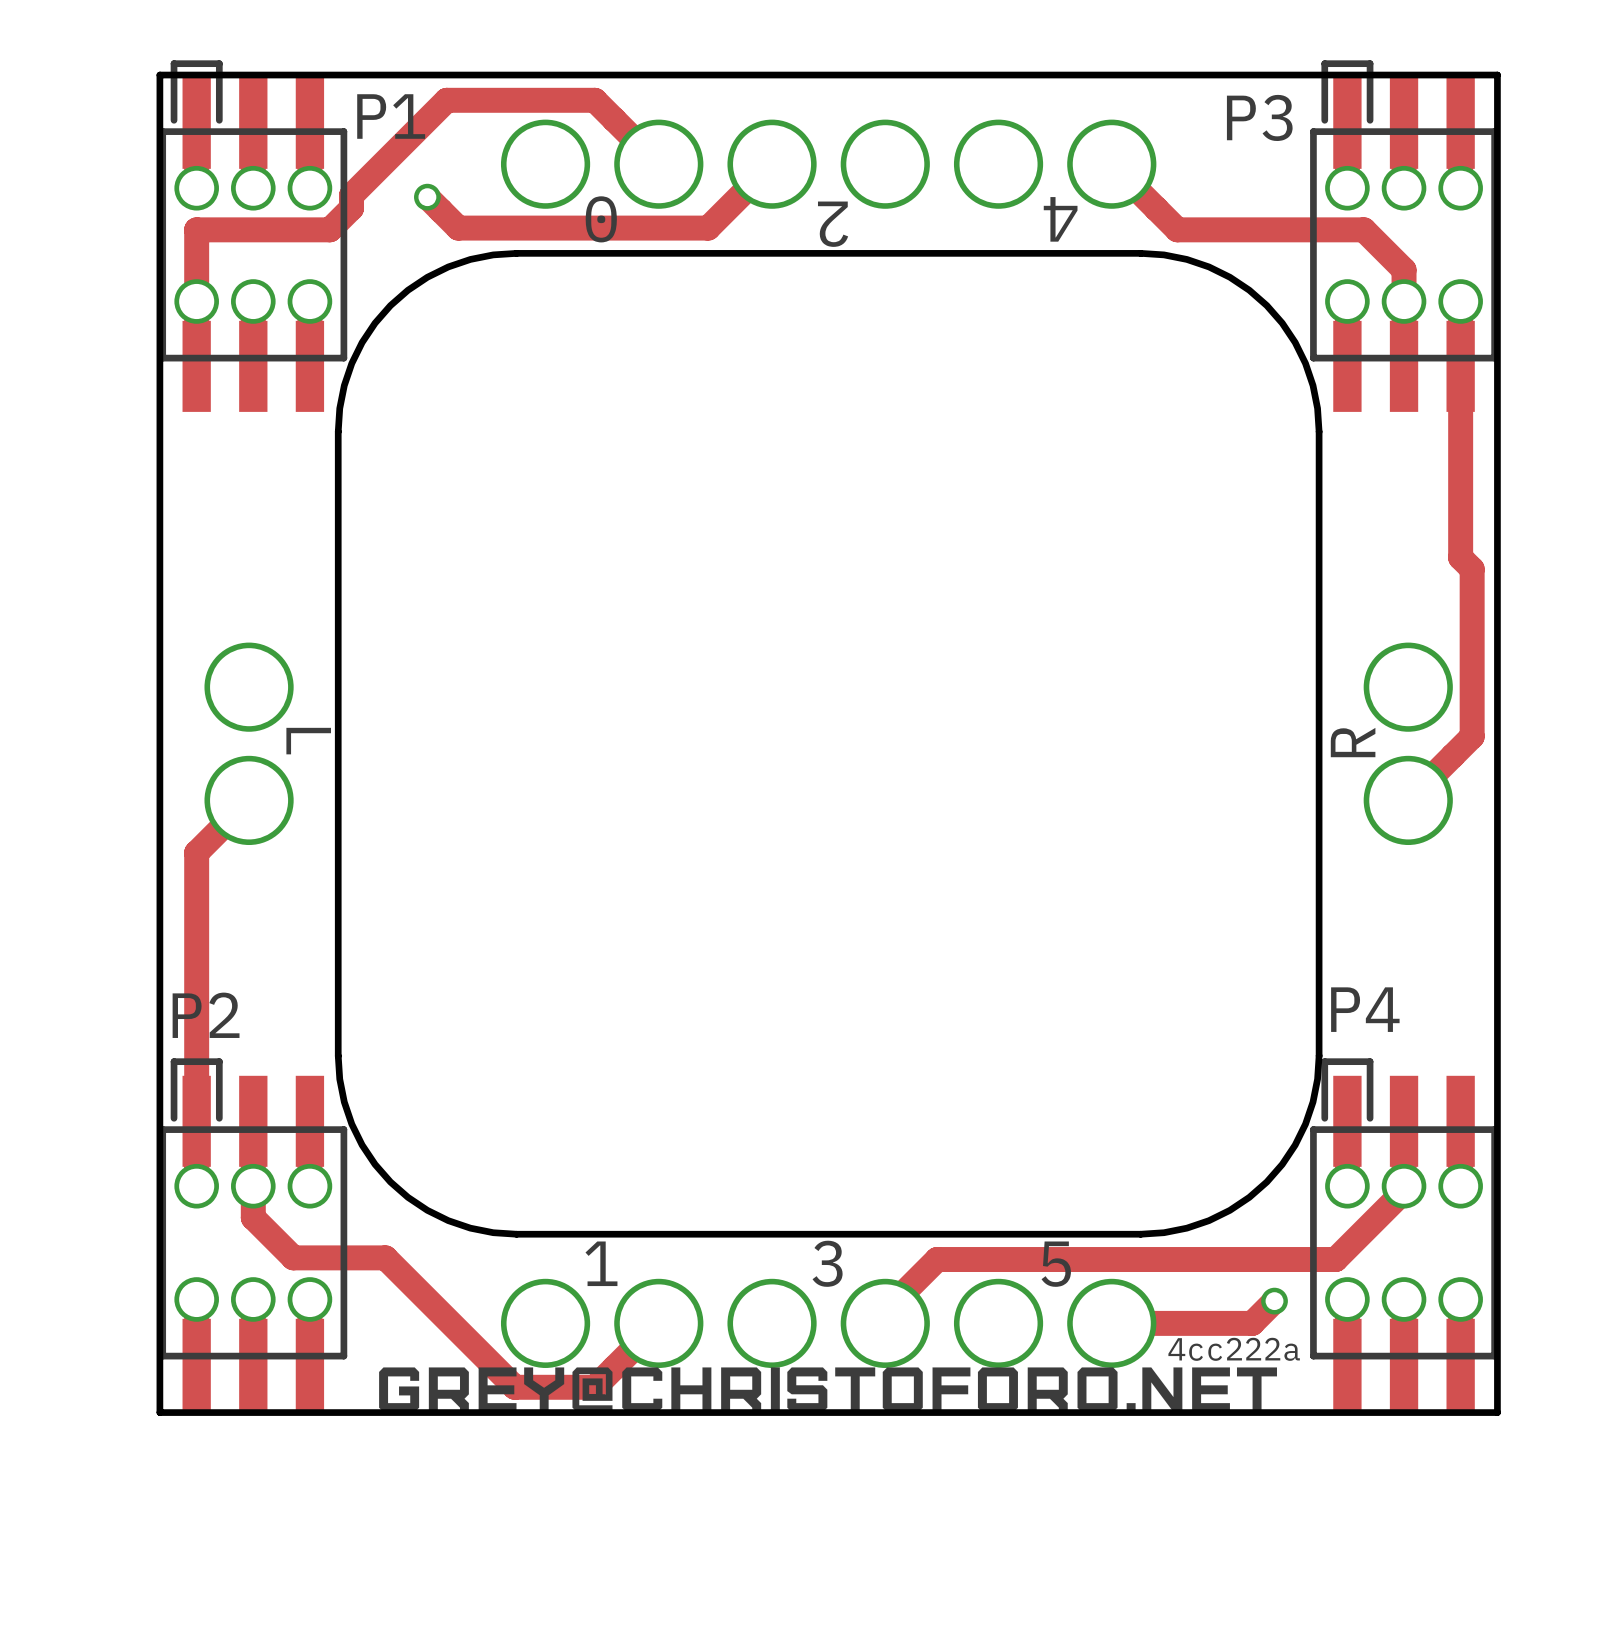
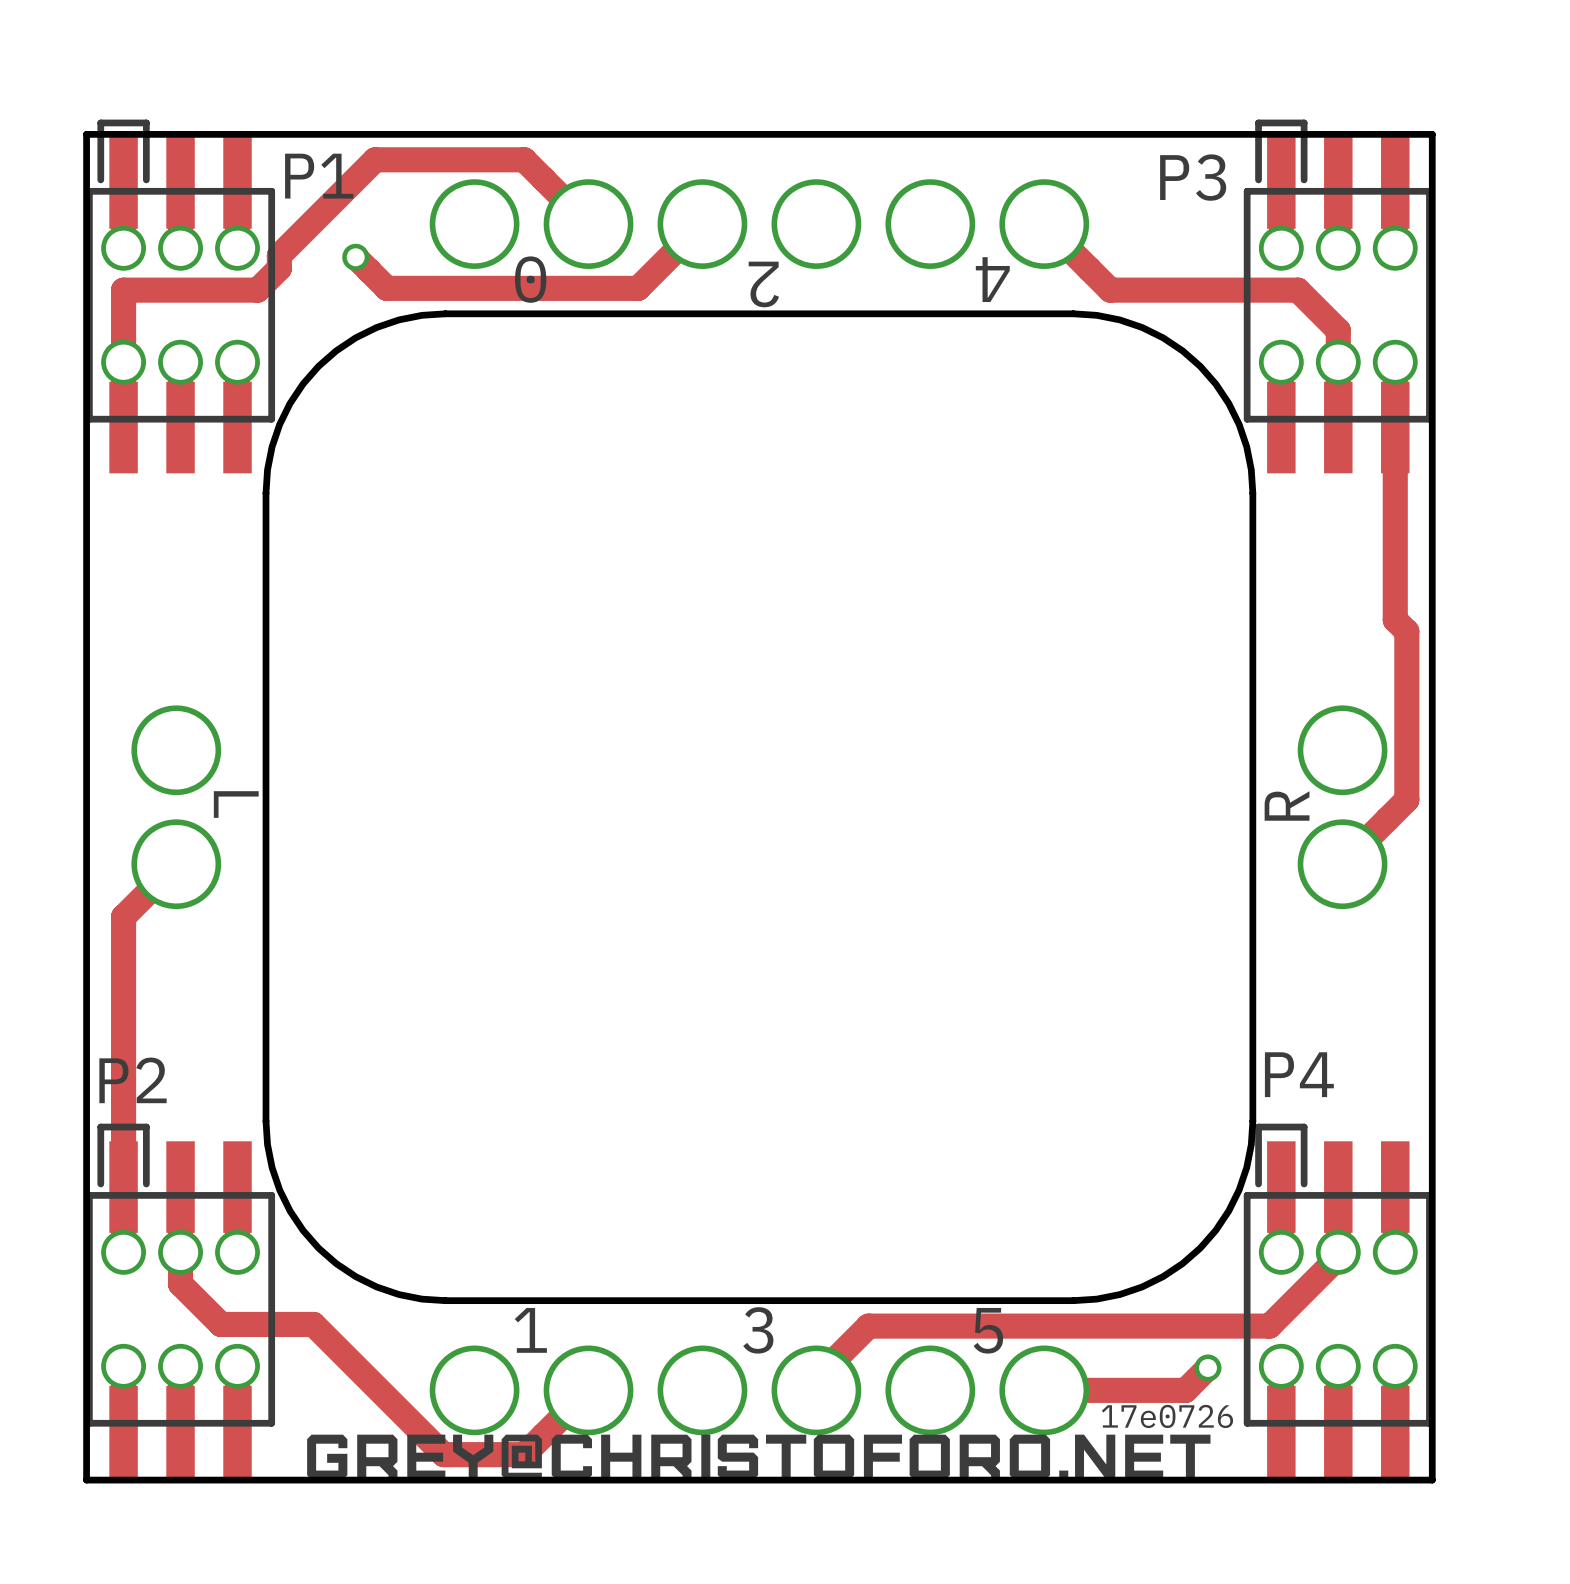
text: 4cc222a (1234, 1349) -> 17e0726 (1167, 1416)

